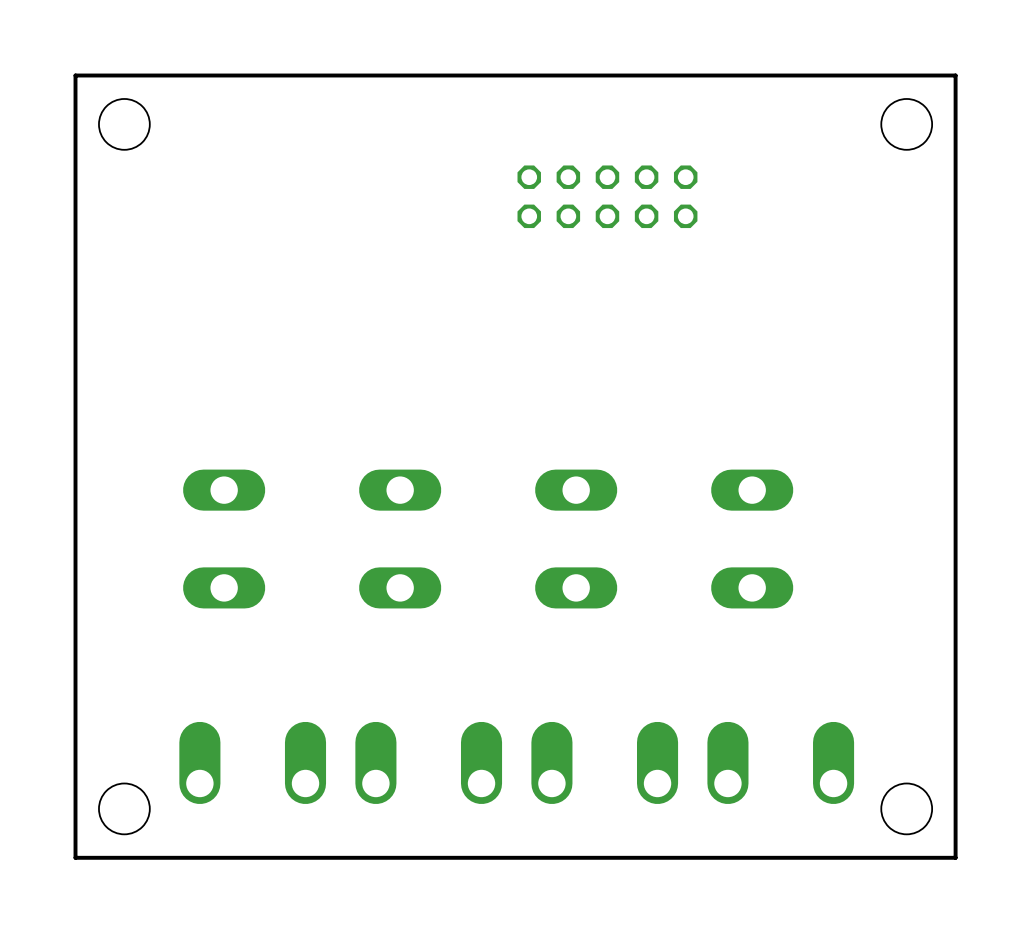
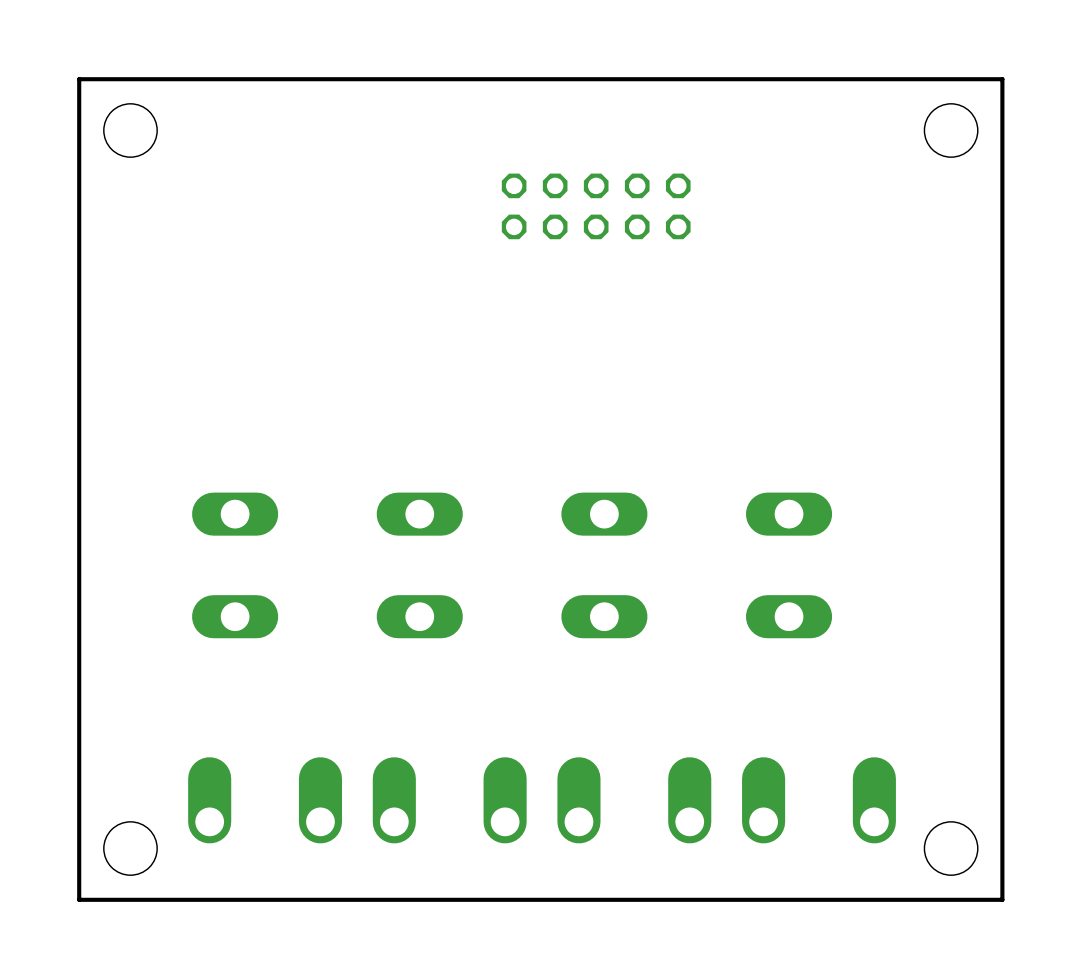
part position: (607, 196) -> (596, 206)

